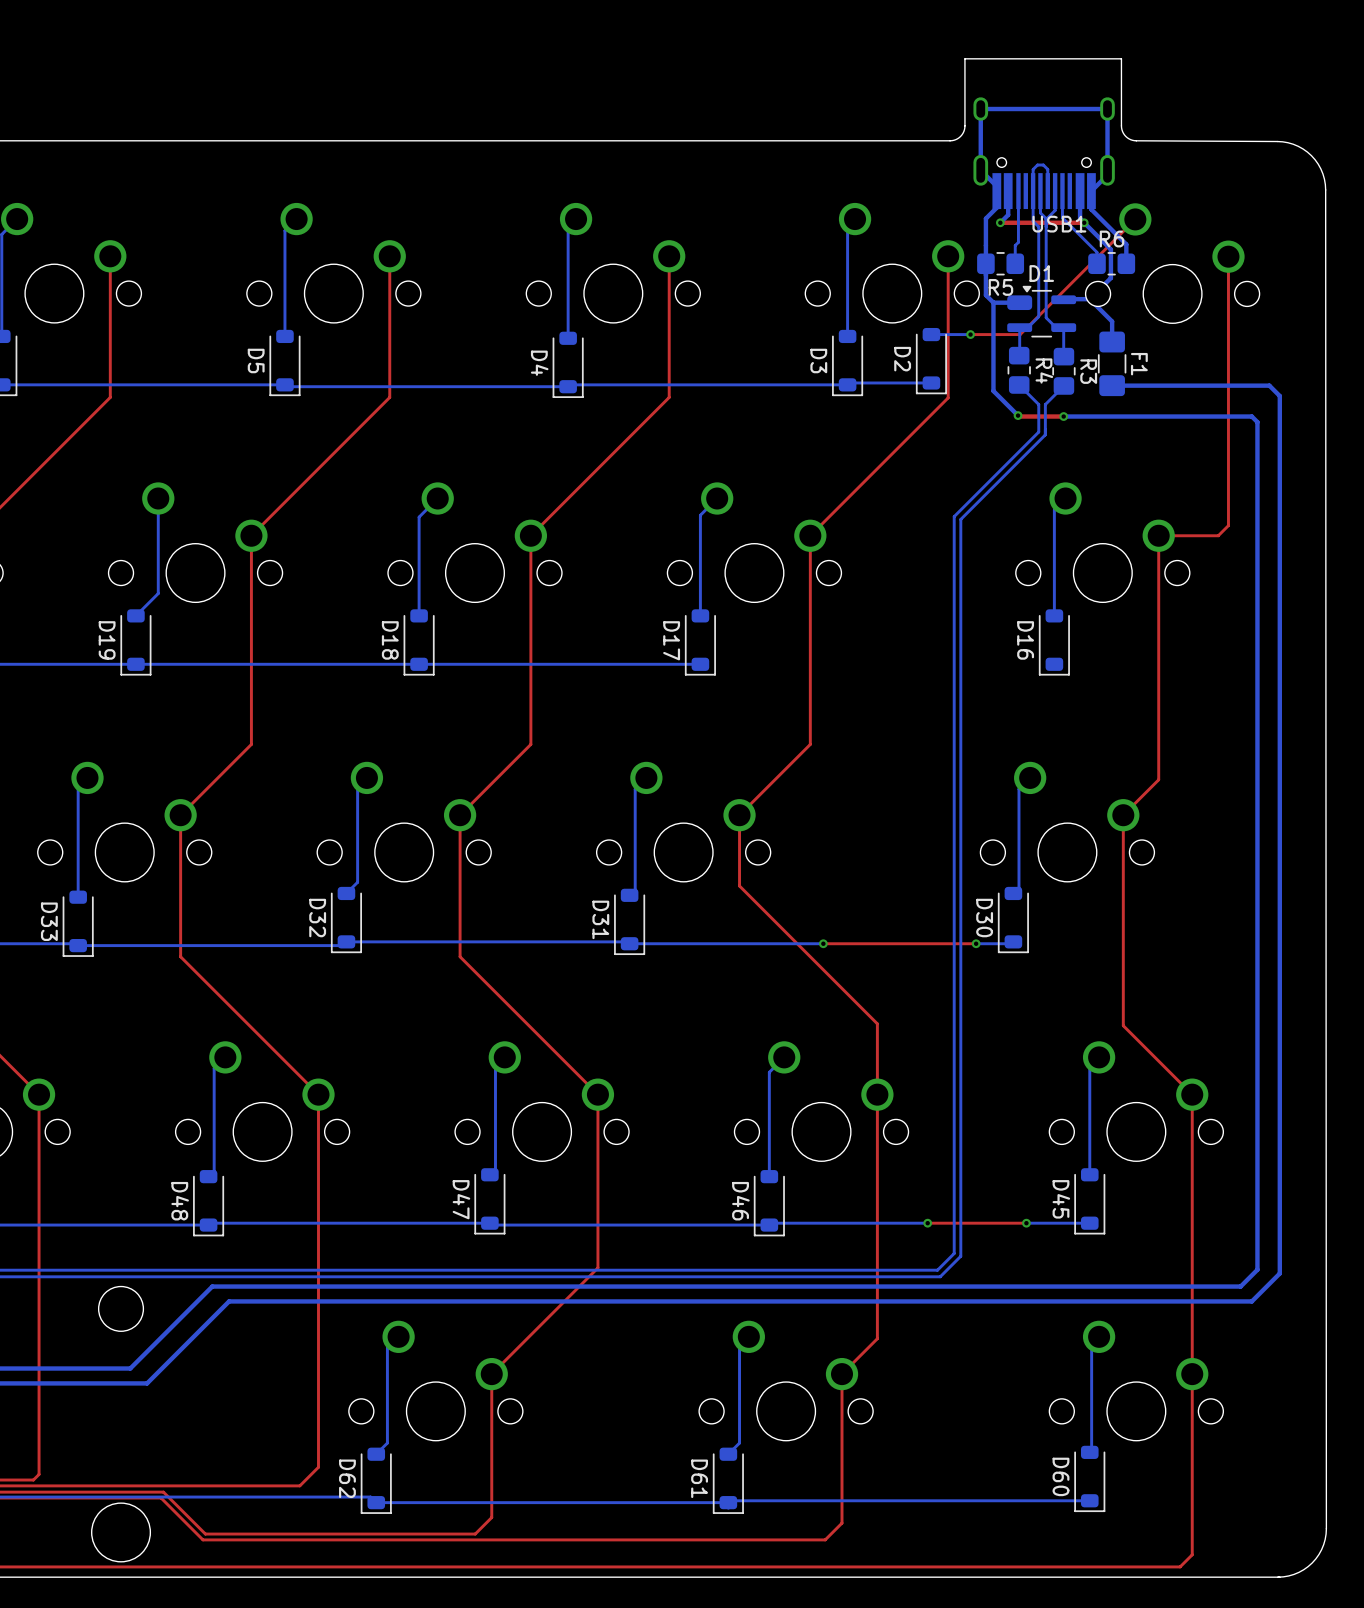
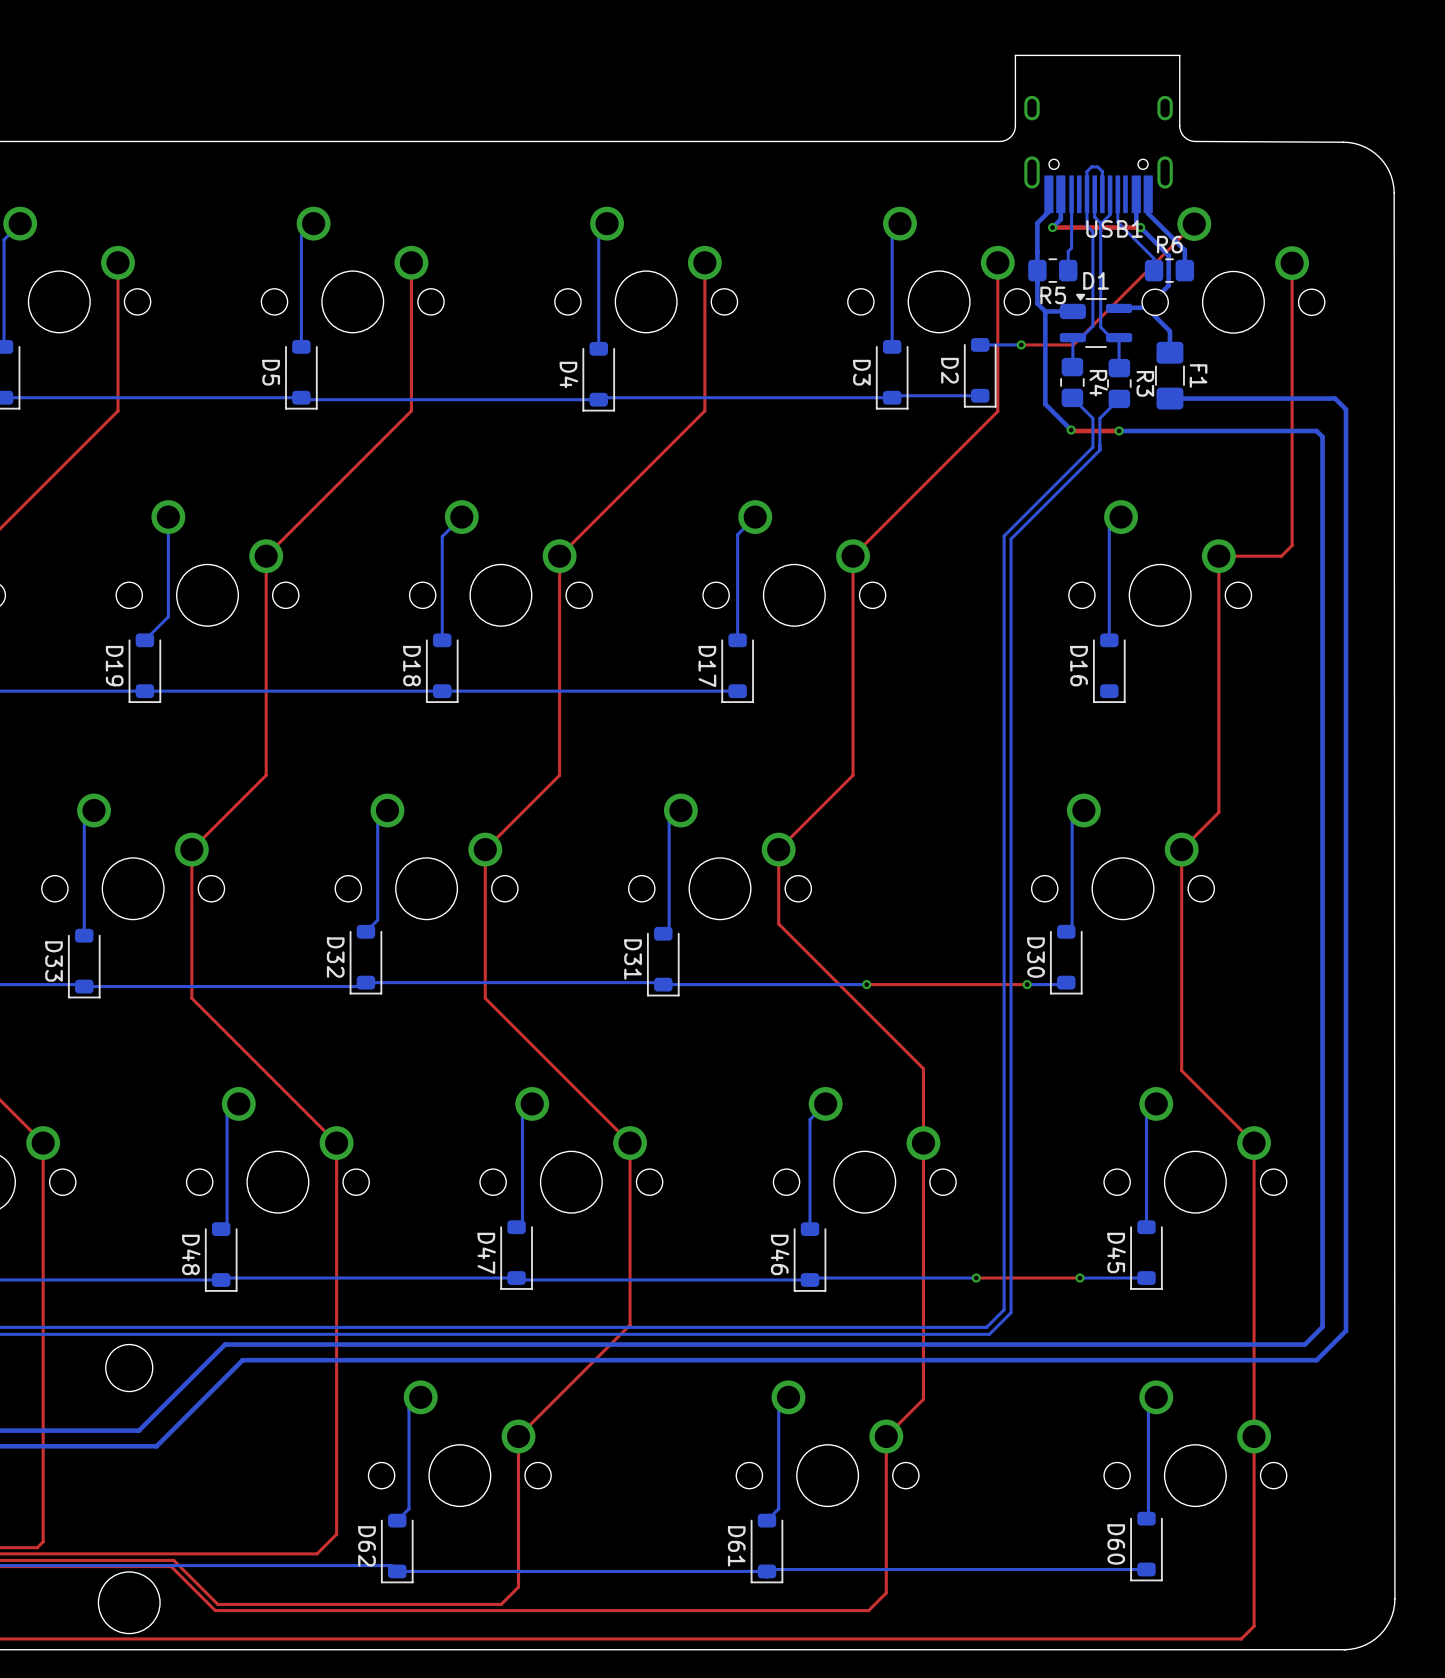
bottom track: (1091, 191) (1107, 175) (1107, 109) (980, 109) (980, 170) (996, 186) (996, 191) -> none

